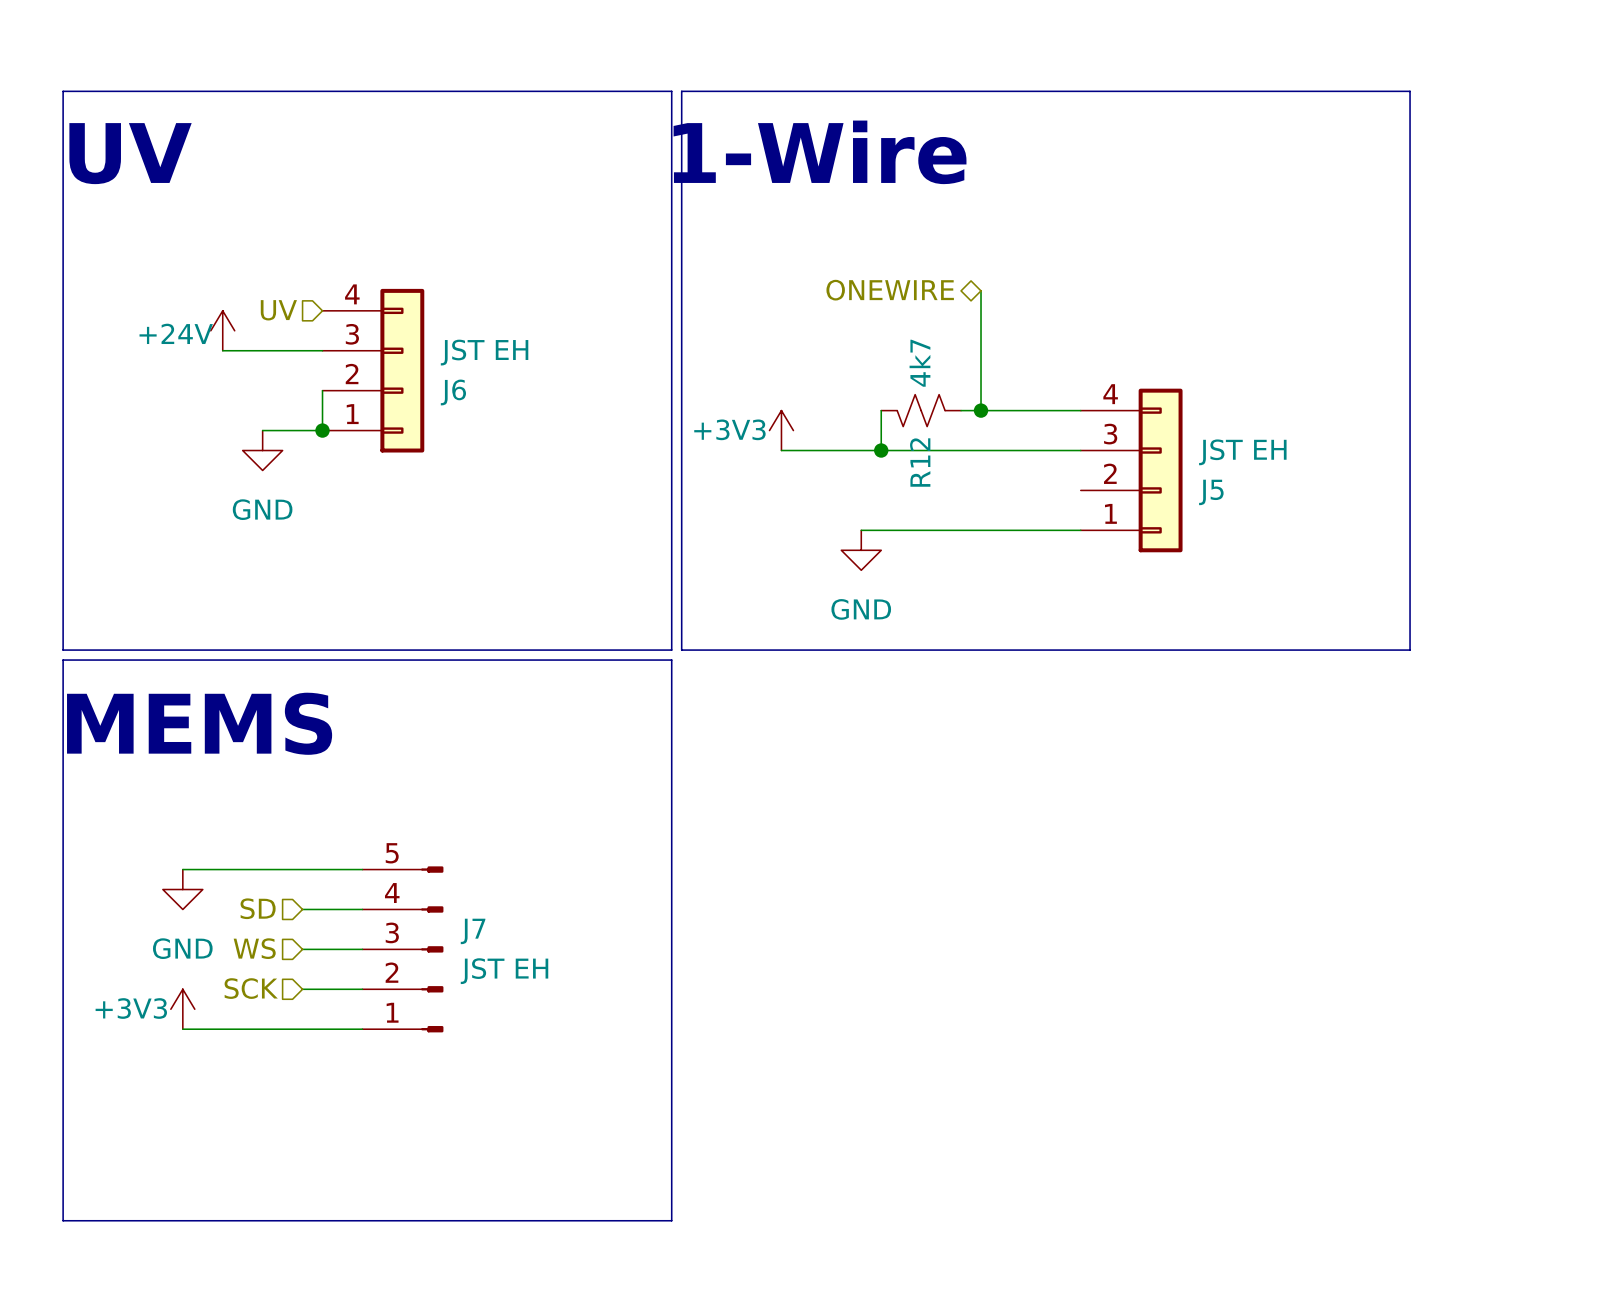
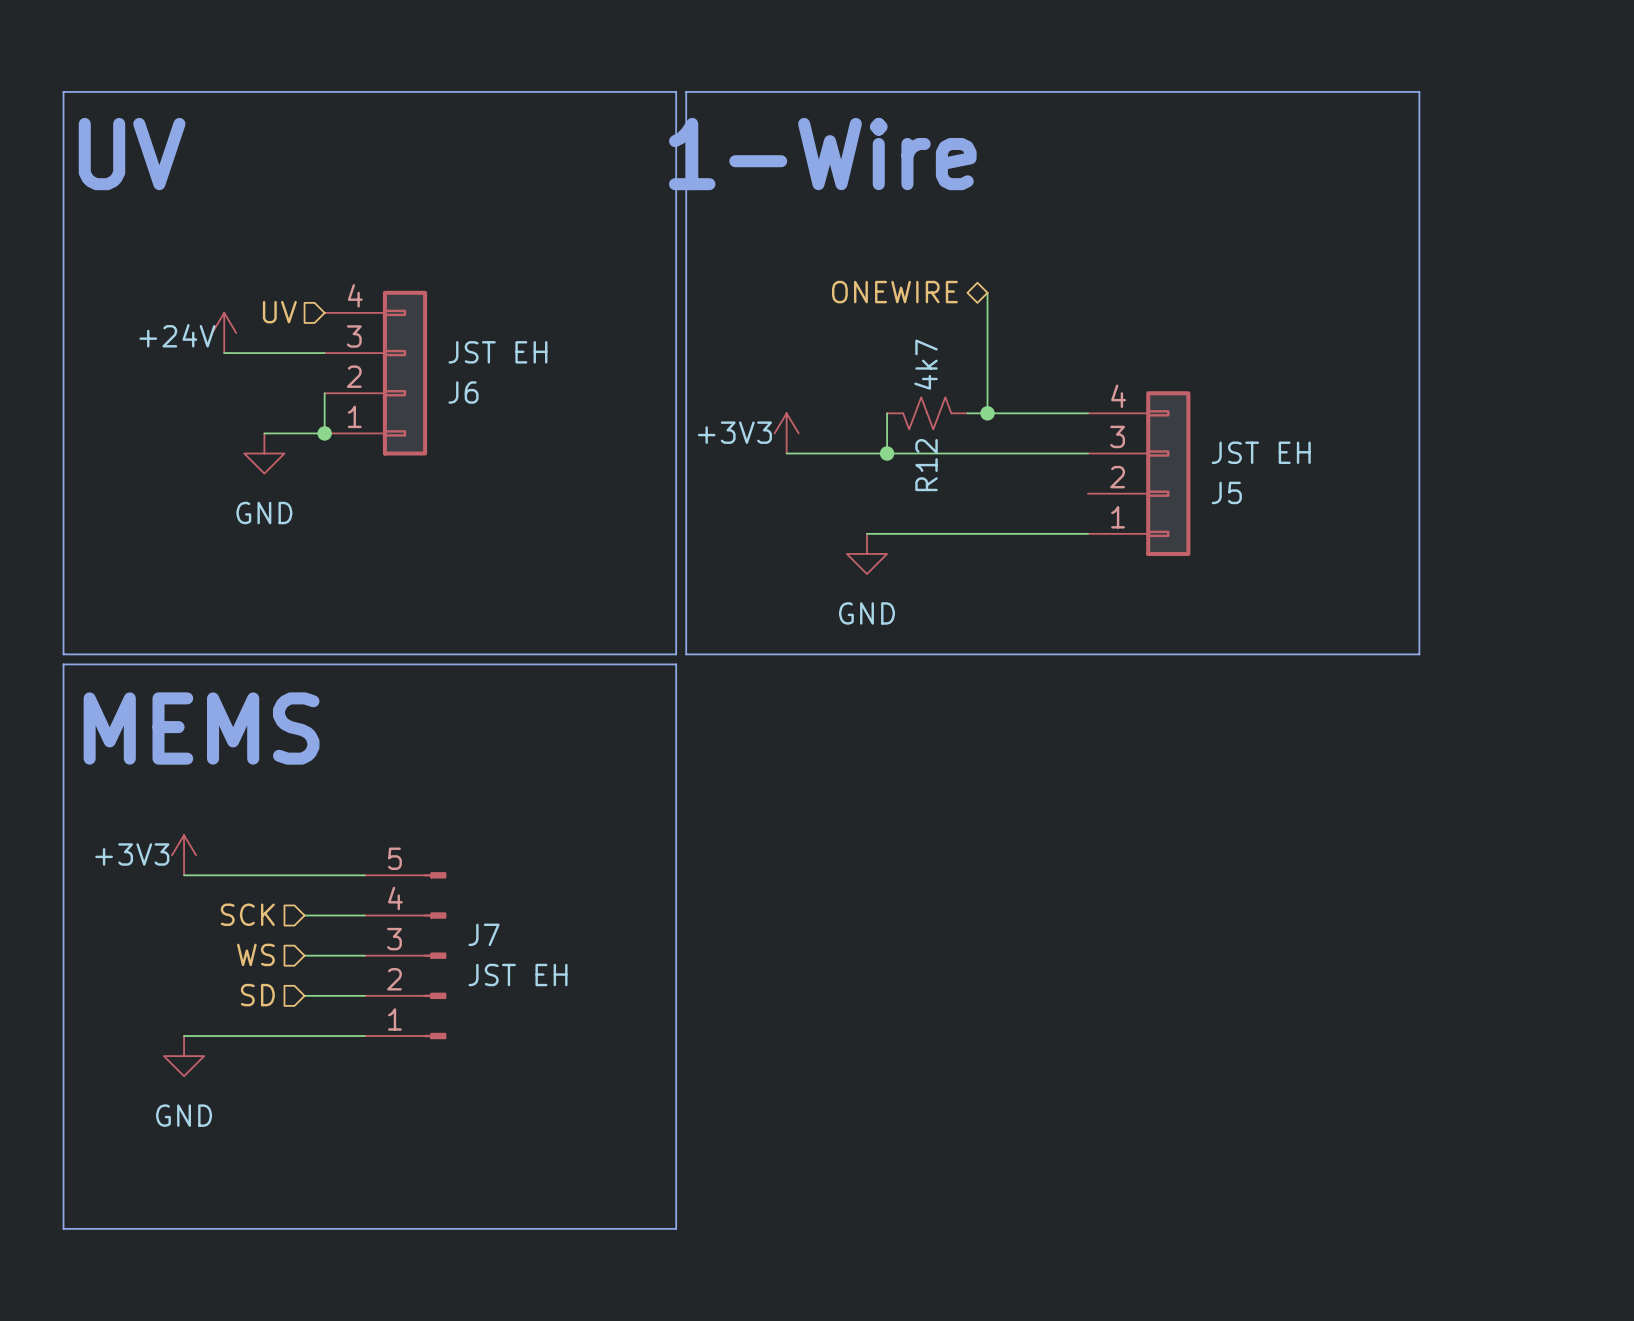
power symbol position: GND (182, 889) -> GND (184, 1056)
hierarchical label: SD (258, 908) -> SCK (247, 914)
hierarchical label: SCK (251, 988) -> SD (257, 995)
power symbol position: +3V3 (182, 1009) -> +3V3 (184, 855)

